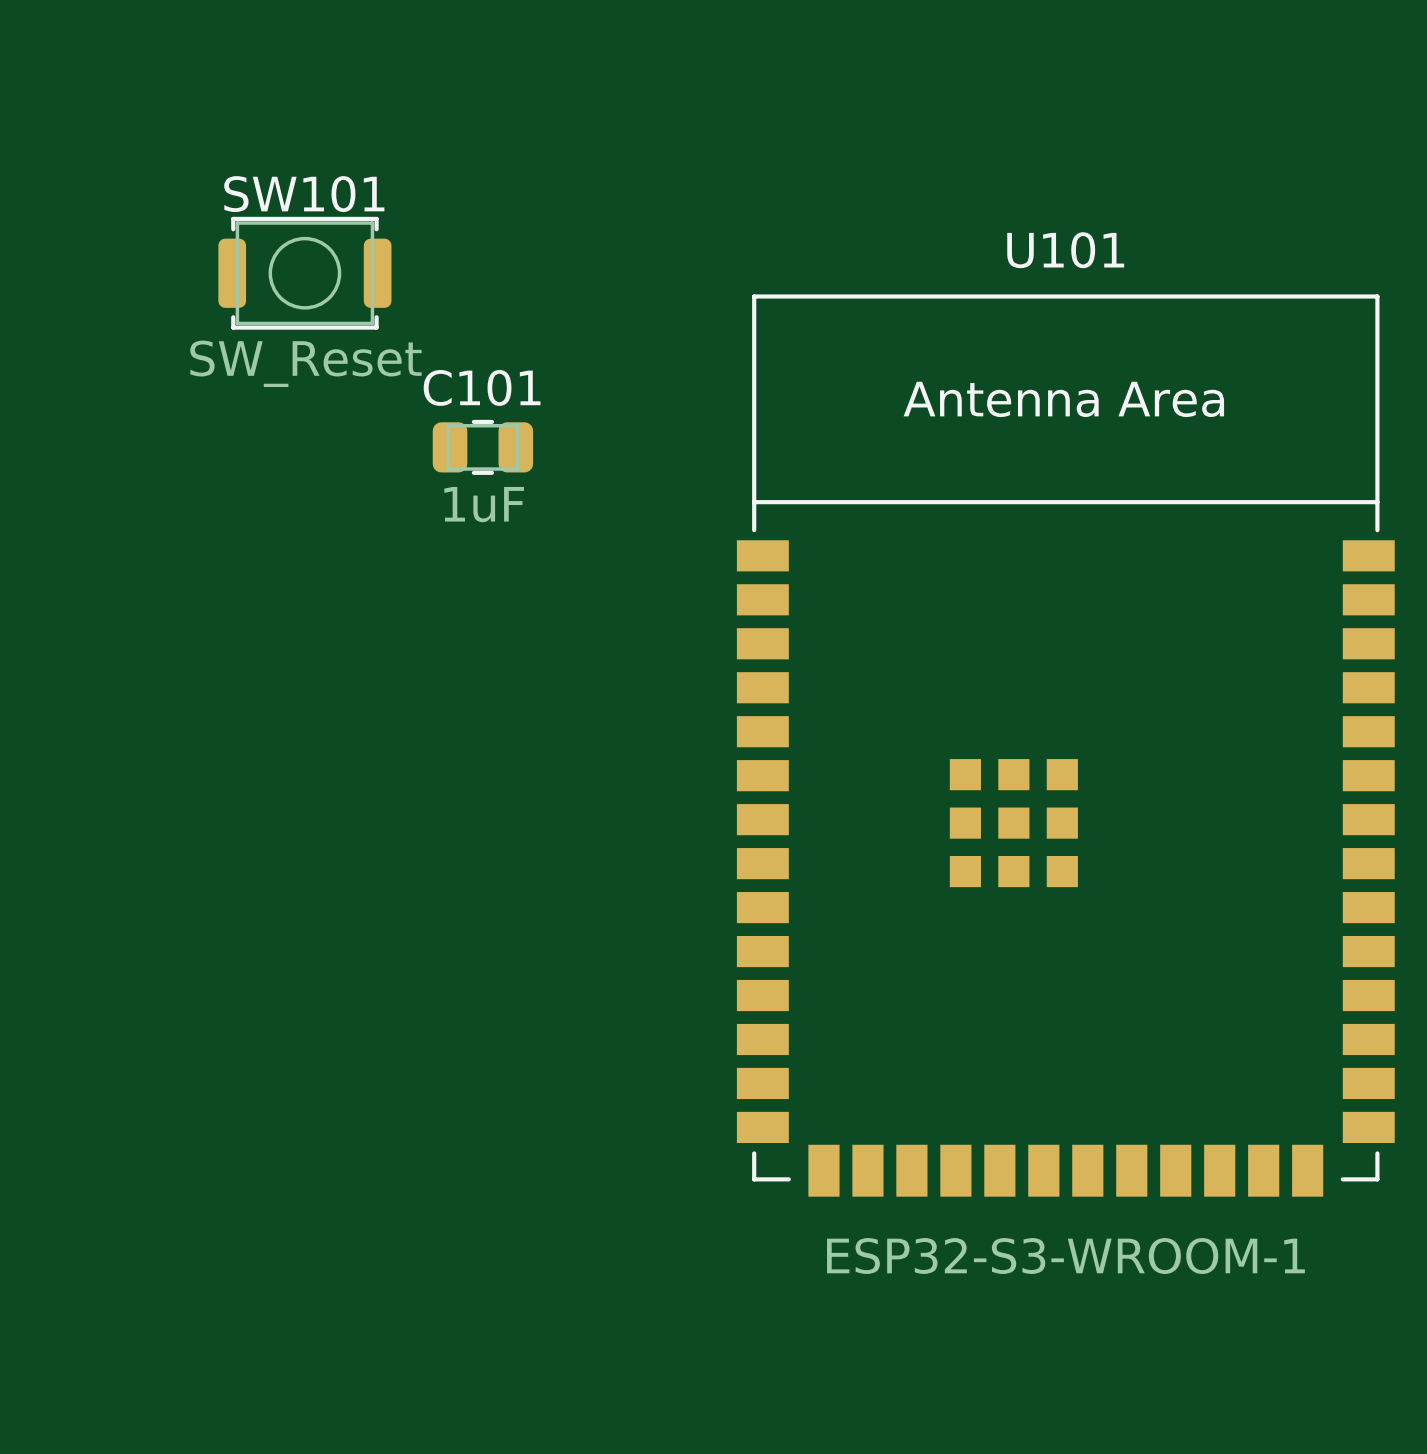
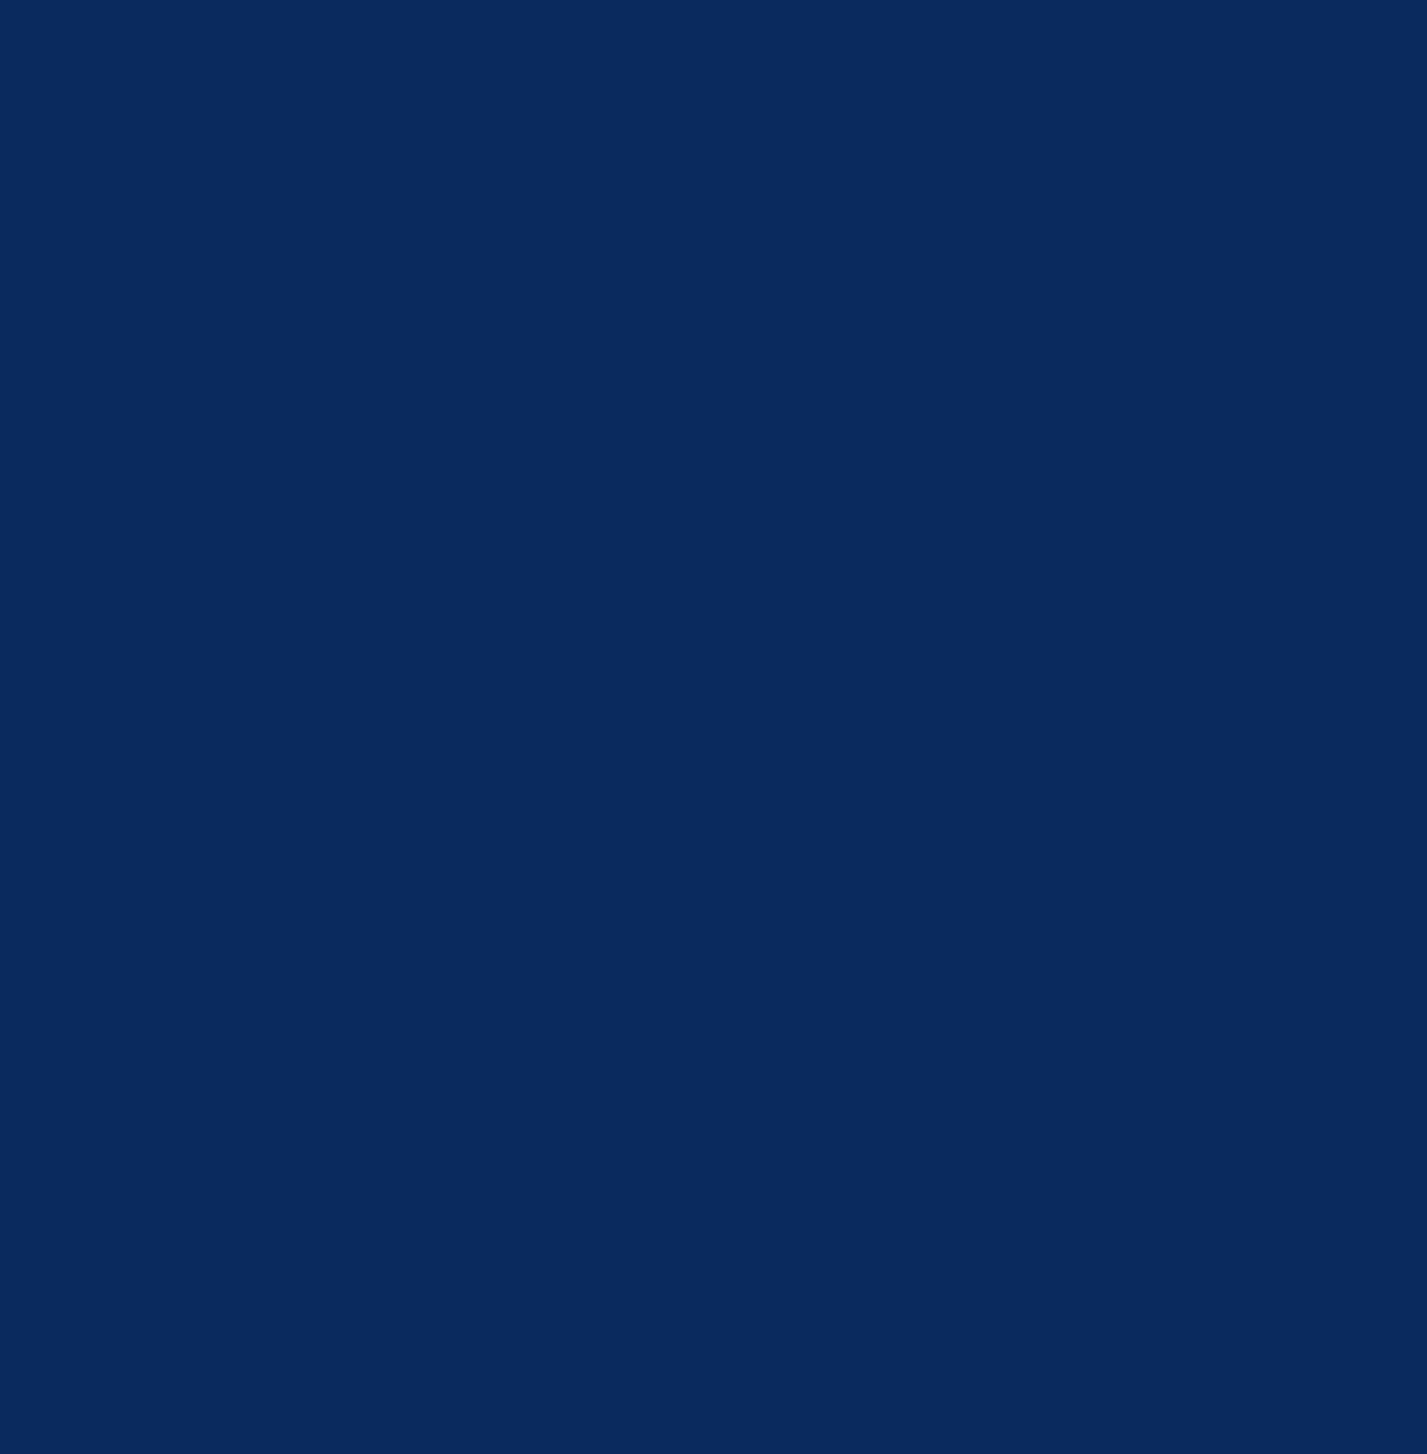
SW101: SW_Reset (304, 273) -> none
C101: 1uF (482, 447) -> none
U101: ESP32-S3-WROOM-1 (1065, 745) -> none

